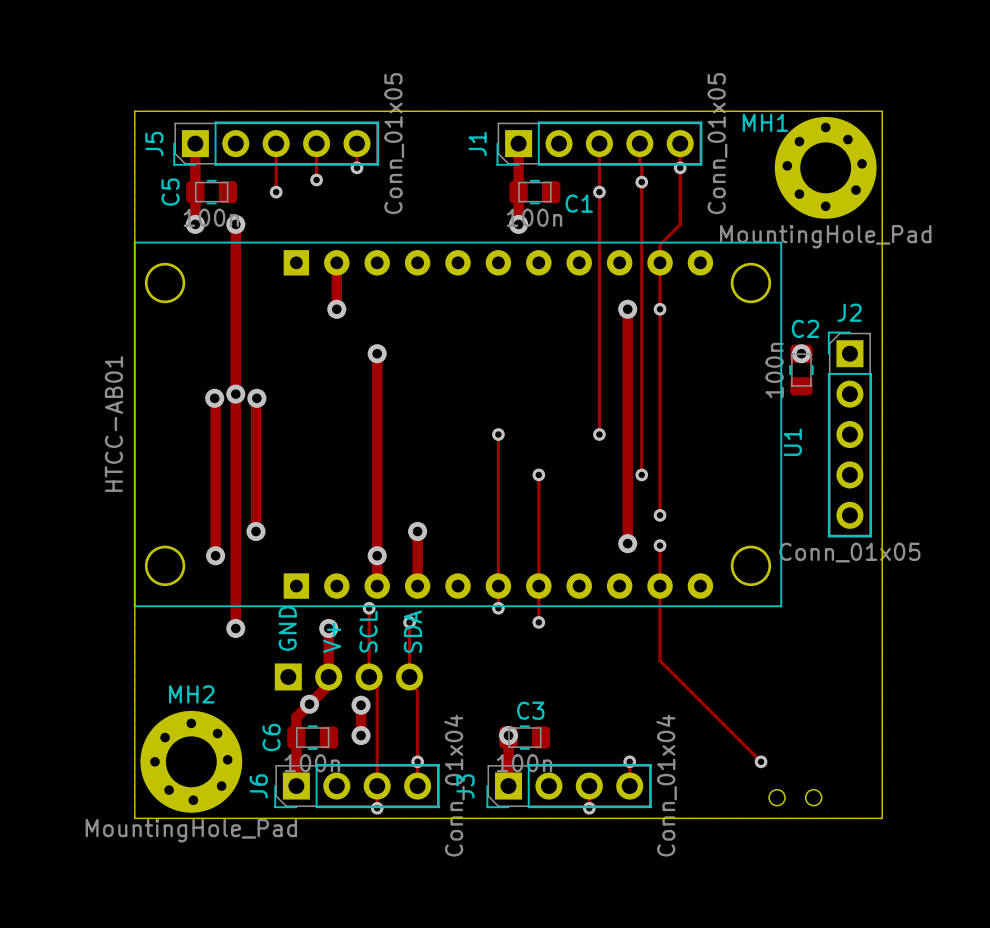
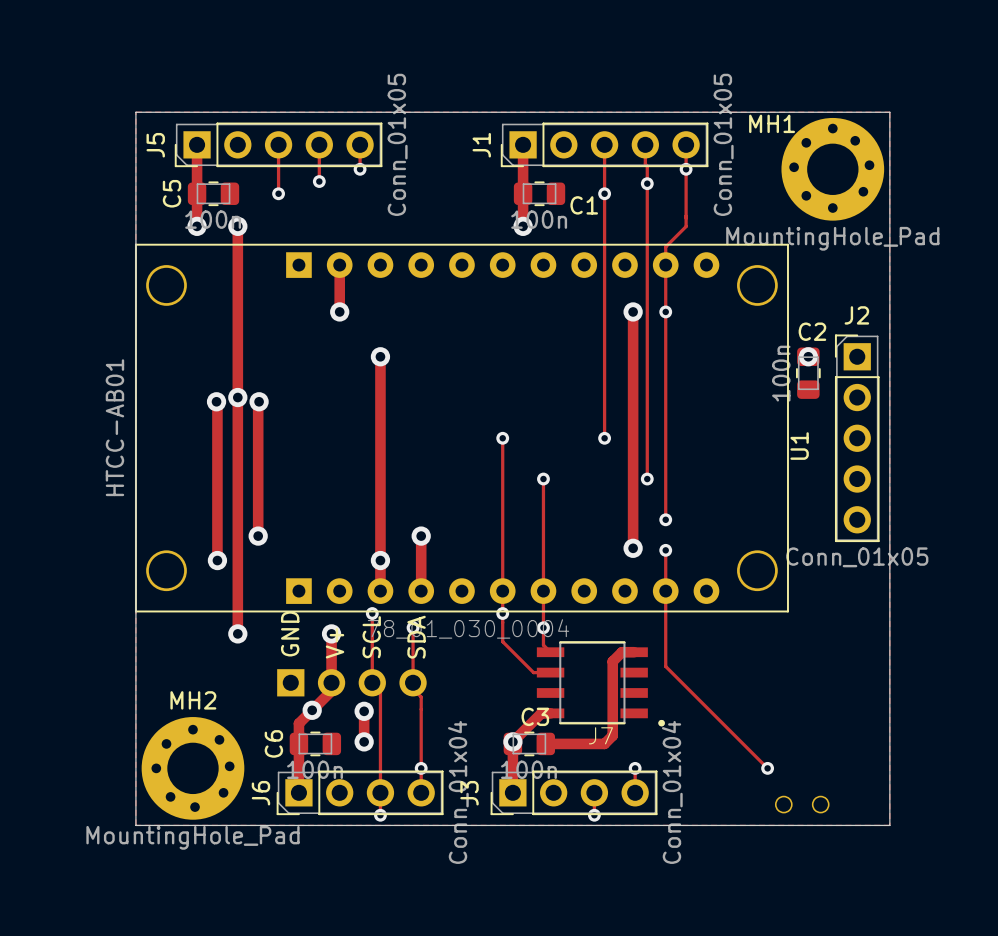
track: none -> (502, 613) (502, 641) (533, 672) (550, 672)
track: none -> (543, 627) (543, 645) (550, 652)
track: none -> (634, 652) (621, 652) (612, 661) (612, 735) (604, 743) (545, 743)
J7: none -> 78_01_030_0004 (600, 683)
track: none -> (550, 713) (541, 713) (512, 741)

